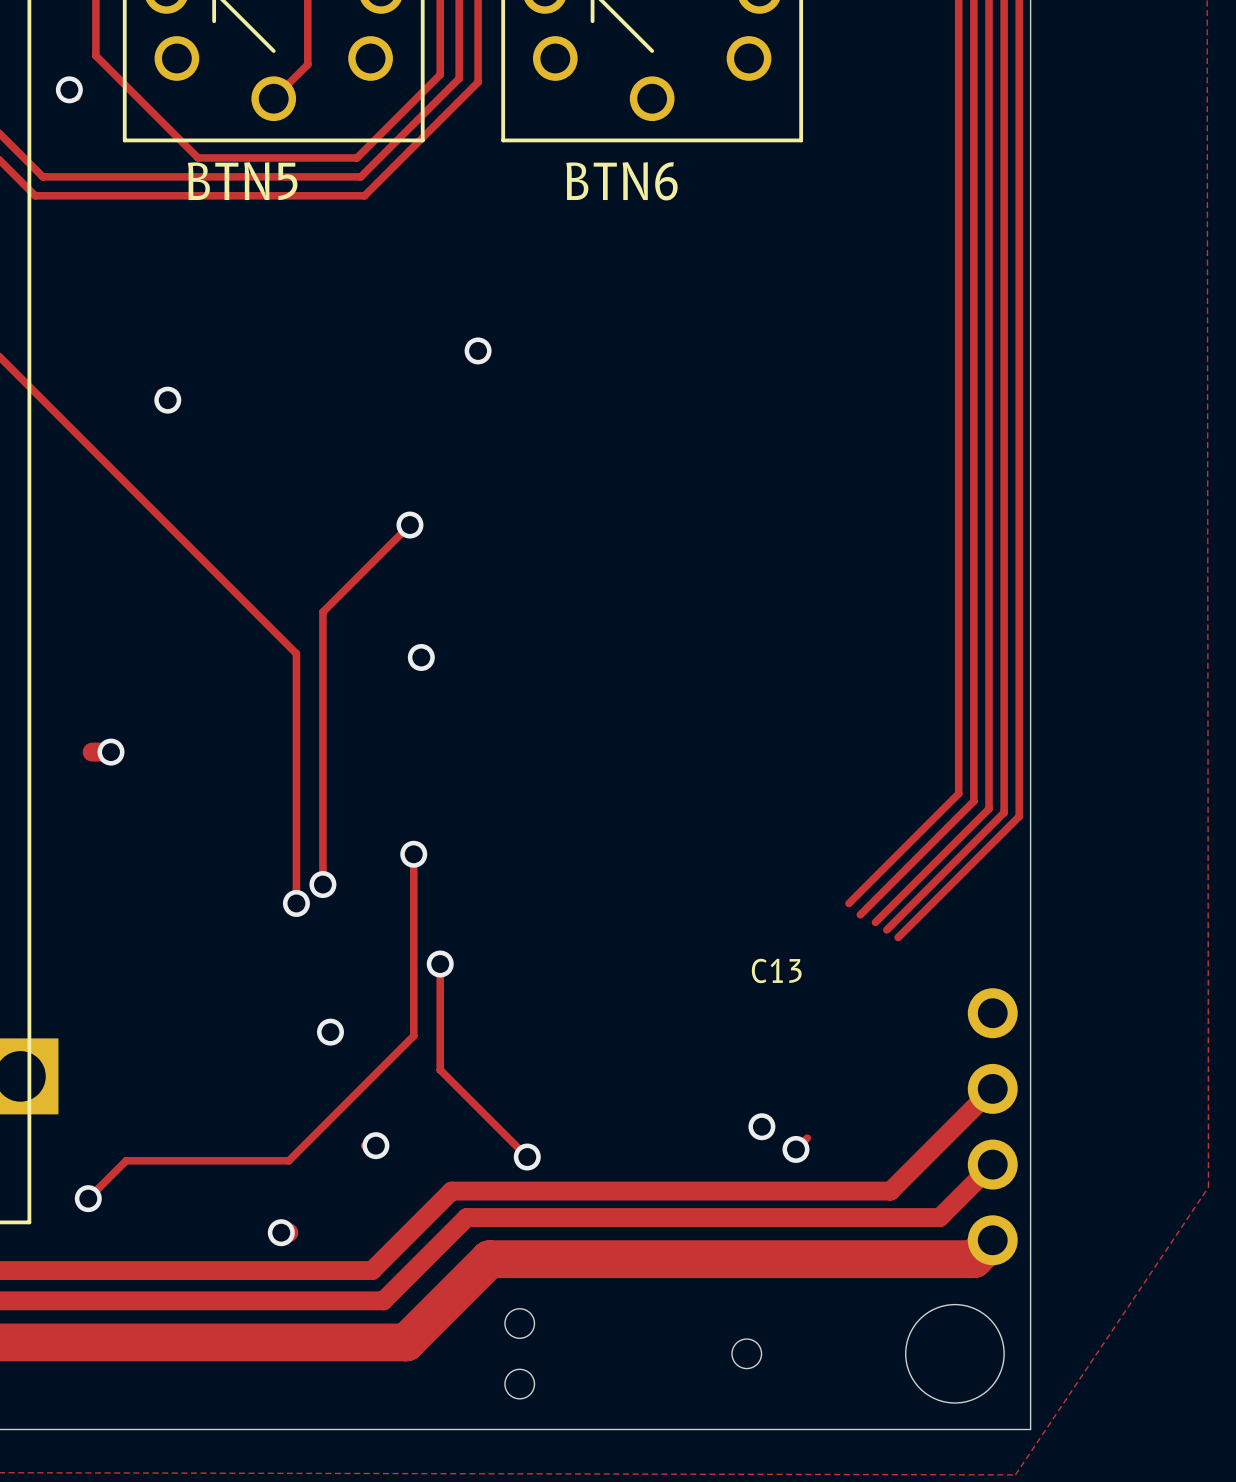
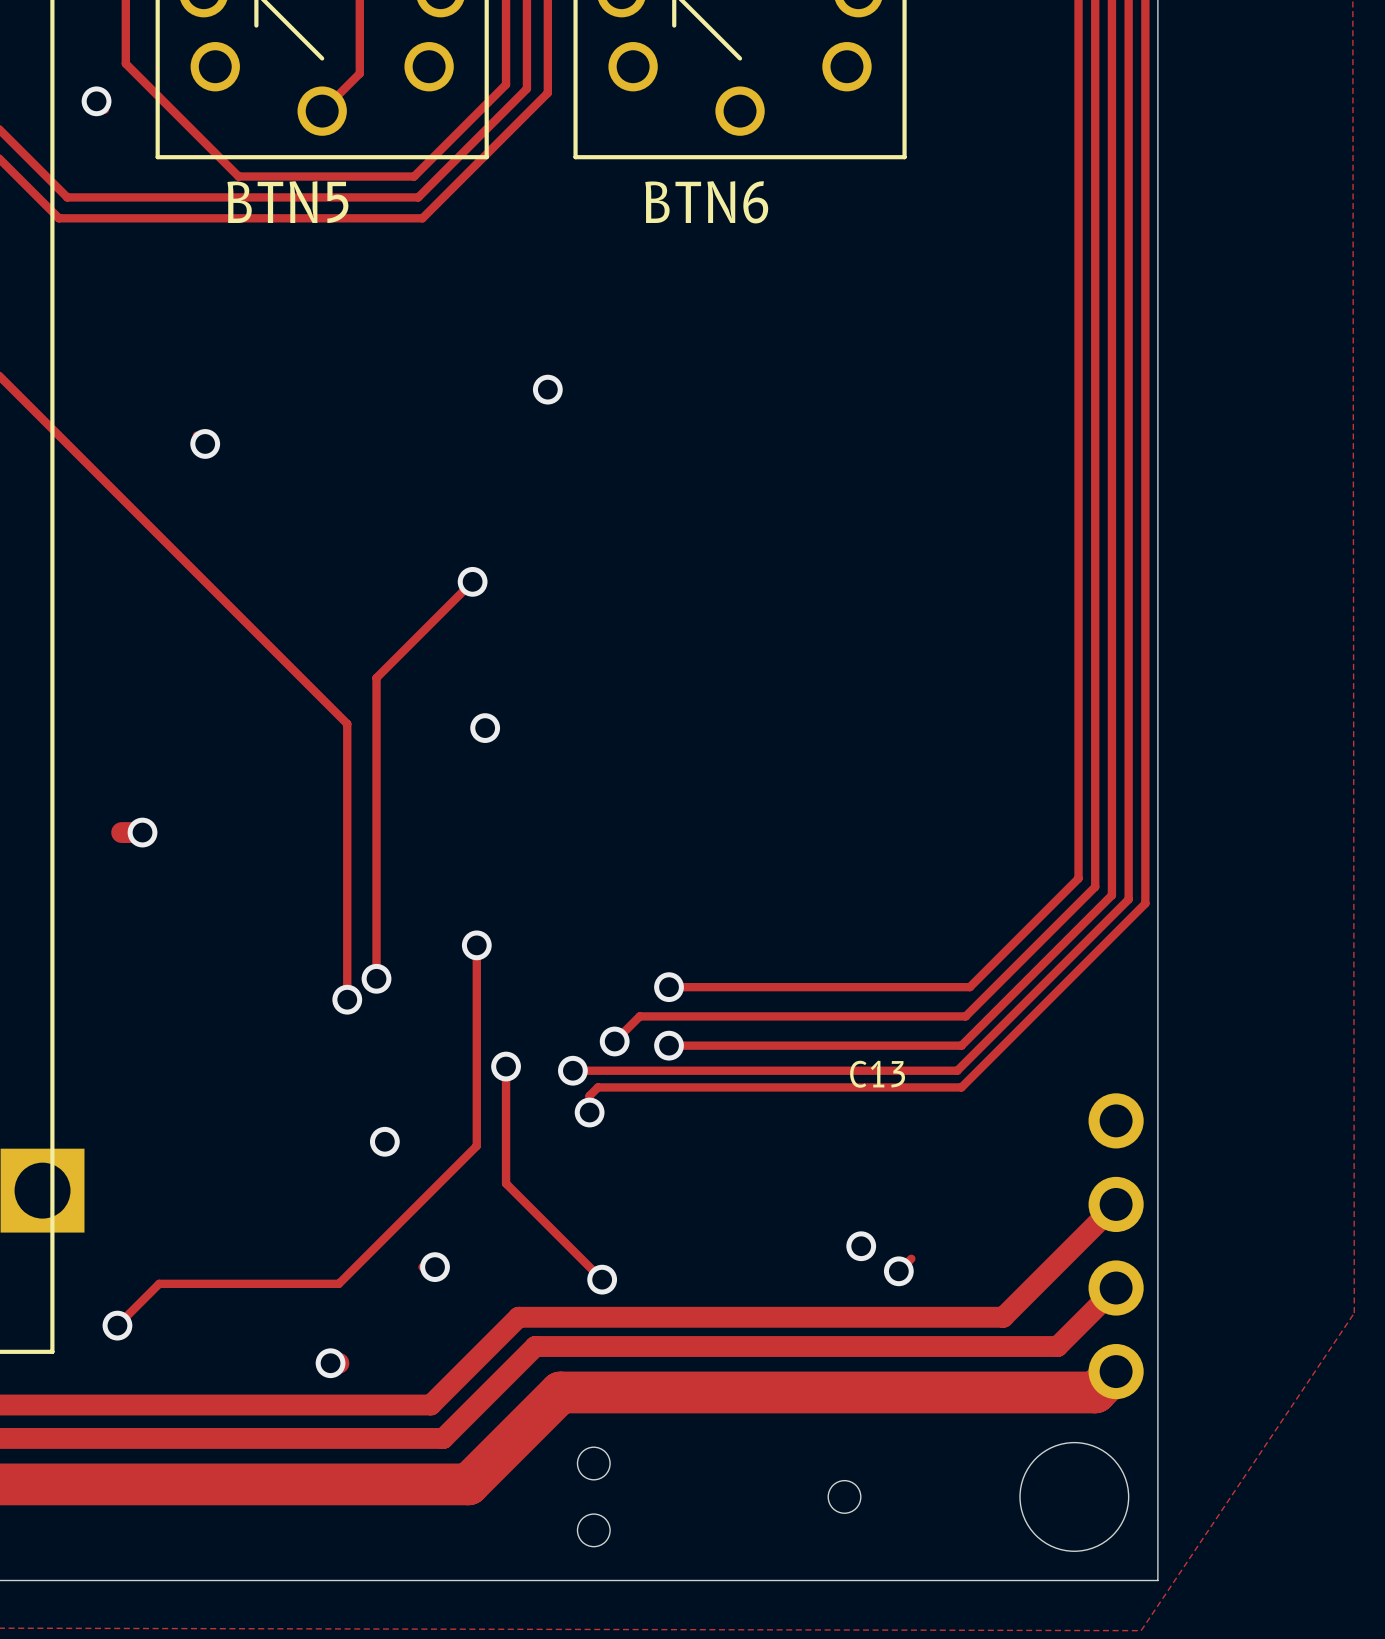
via: none -> (669, 987)
track: (860, 892) (848, 903) -> (969, 987) (669, 987)
track: none -> (969, 1012) (965, 1016) (639, 1016) (614, 1041)
track: none -> (986, 1020) (961, 1045) (669, 1045)
track: none -> (999, 1028) (957, 1070) (572, 1070)
track: none -> (1011, 1037) (961, 1087) (597, 1087) (589, 1095) (589, 1112)
via: none -> (614, 1041)
via: none -> (669, 1045)
via: none -> (572, 1070)
via: none -> (589, 1112)

